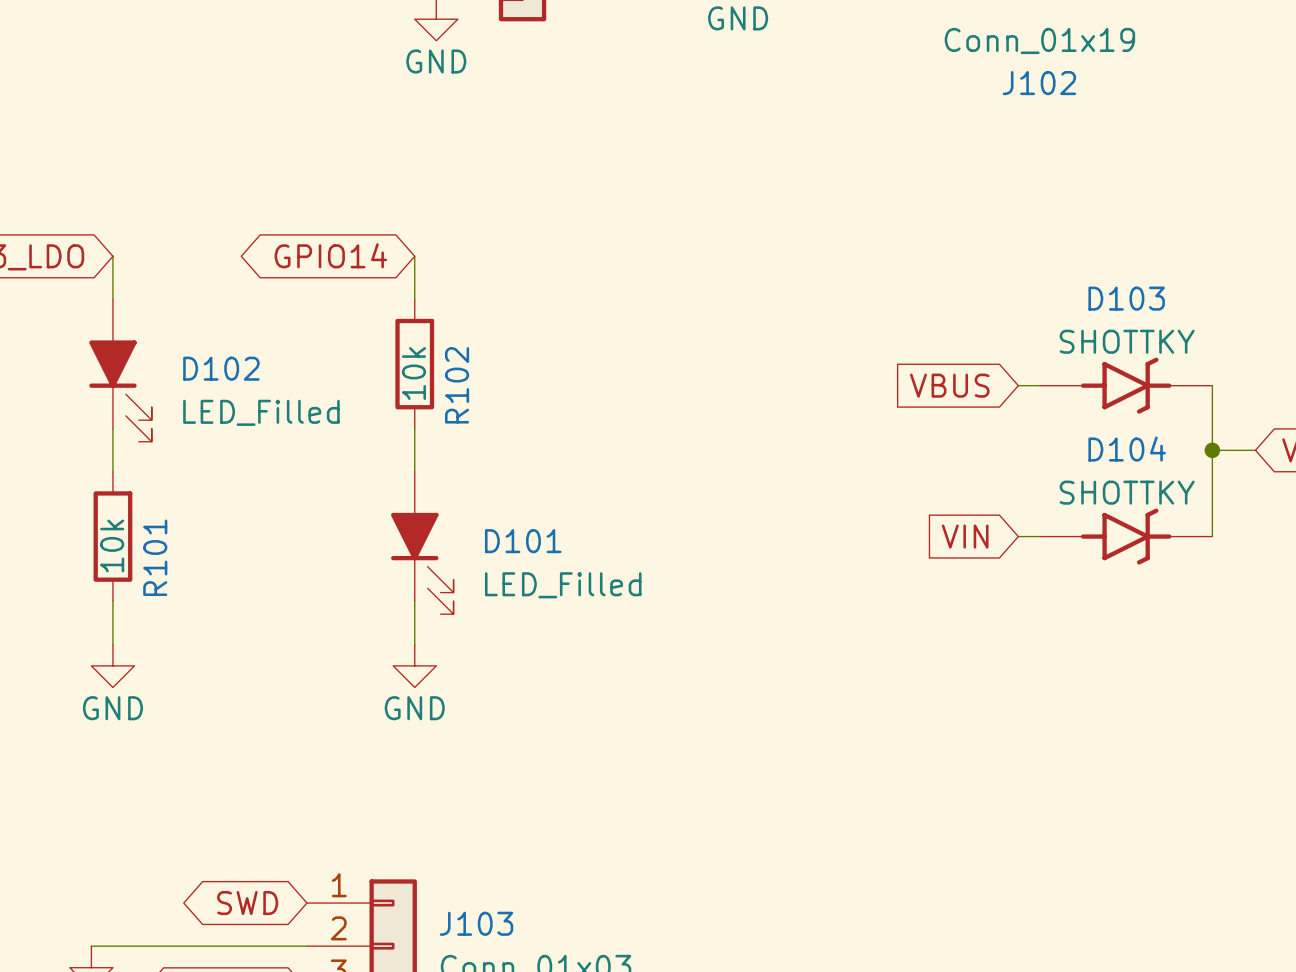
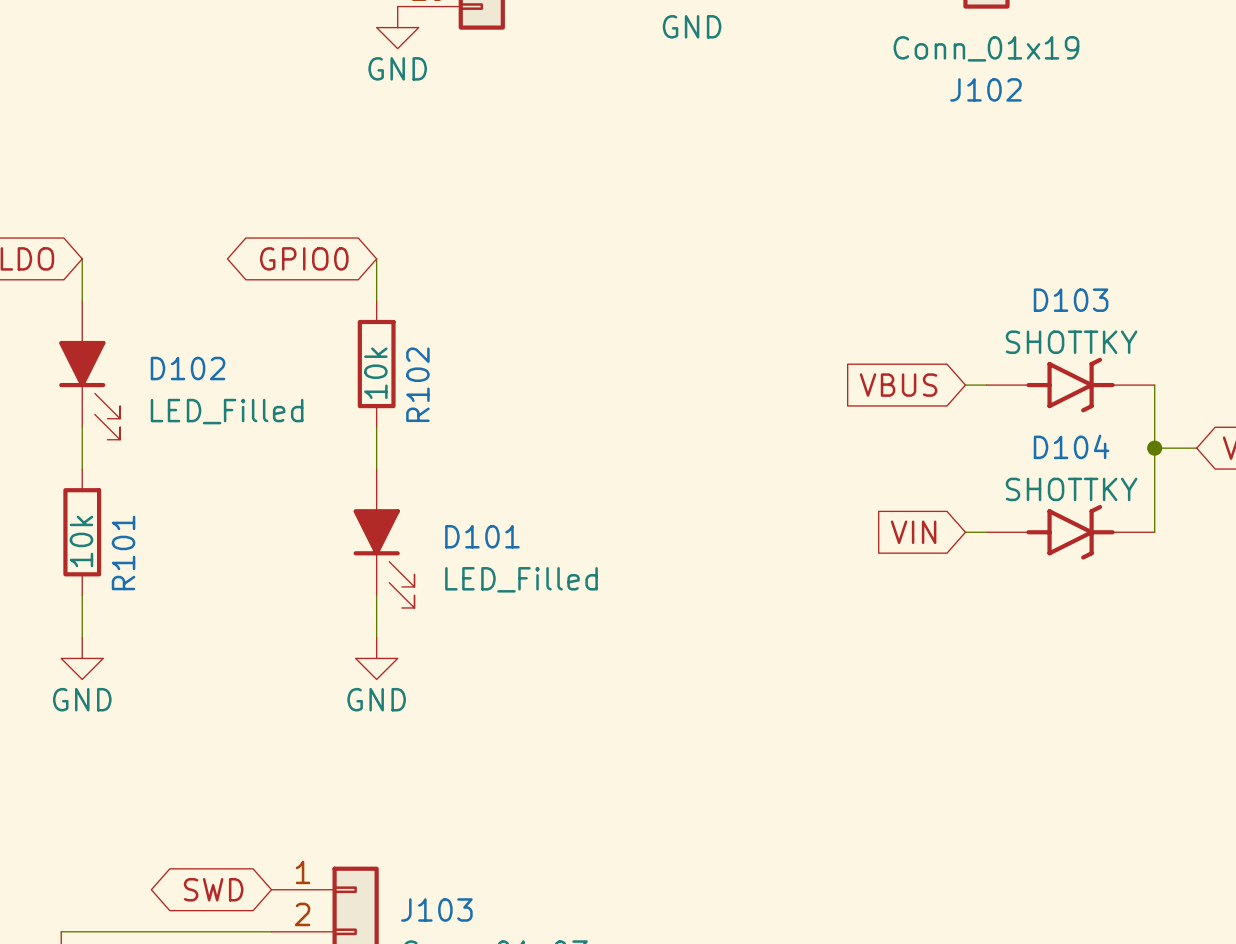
global label: GPIO14 (330, 255) -> GPIO0 (304, 258)

